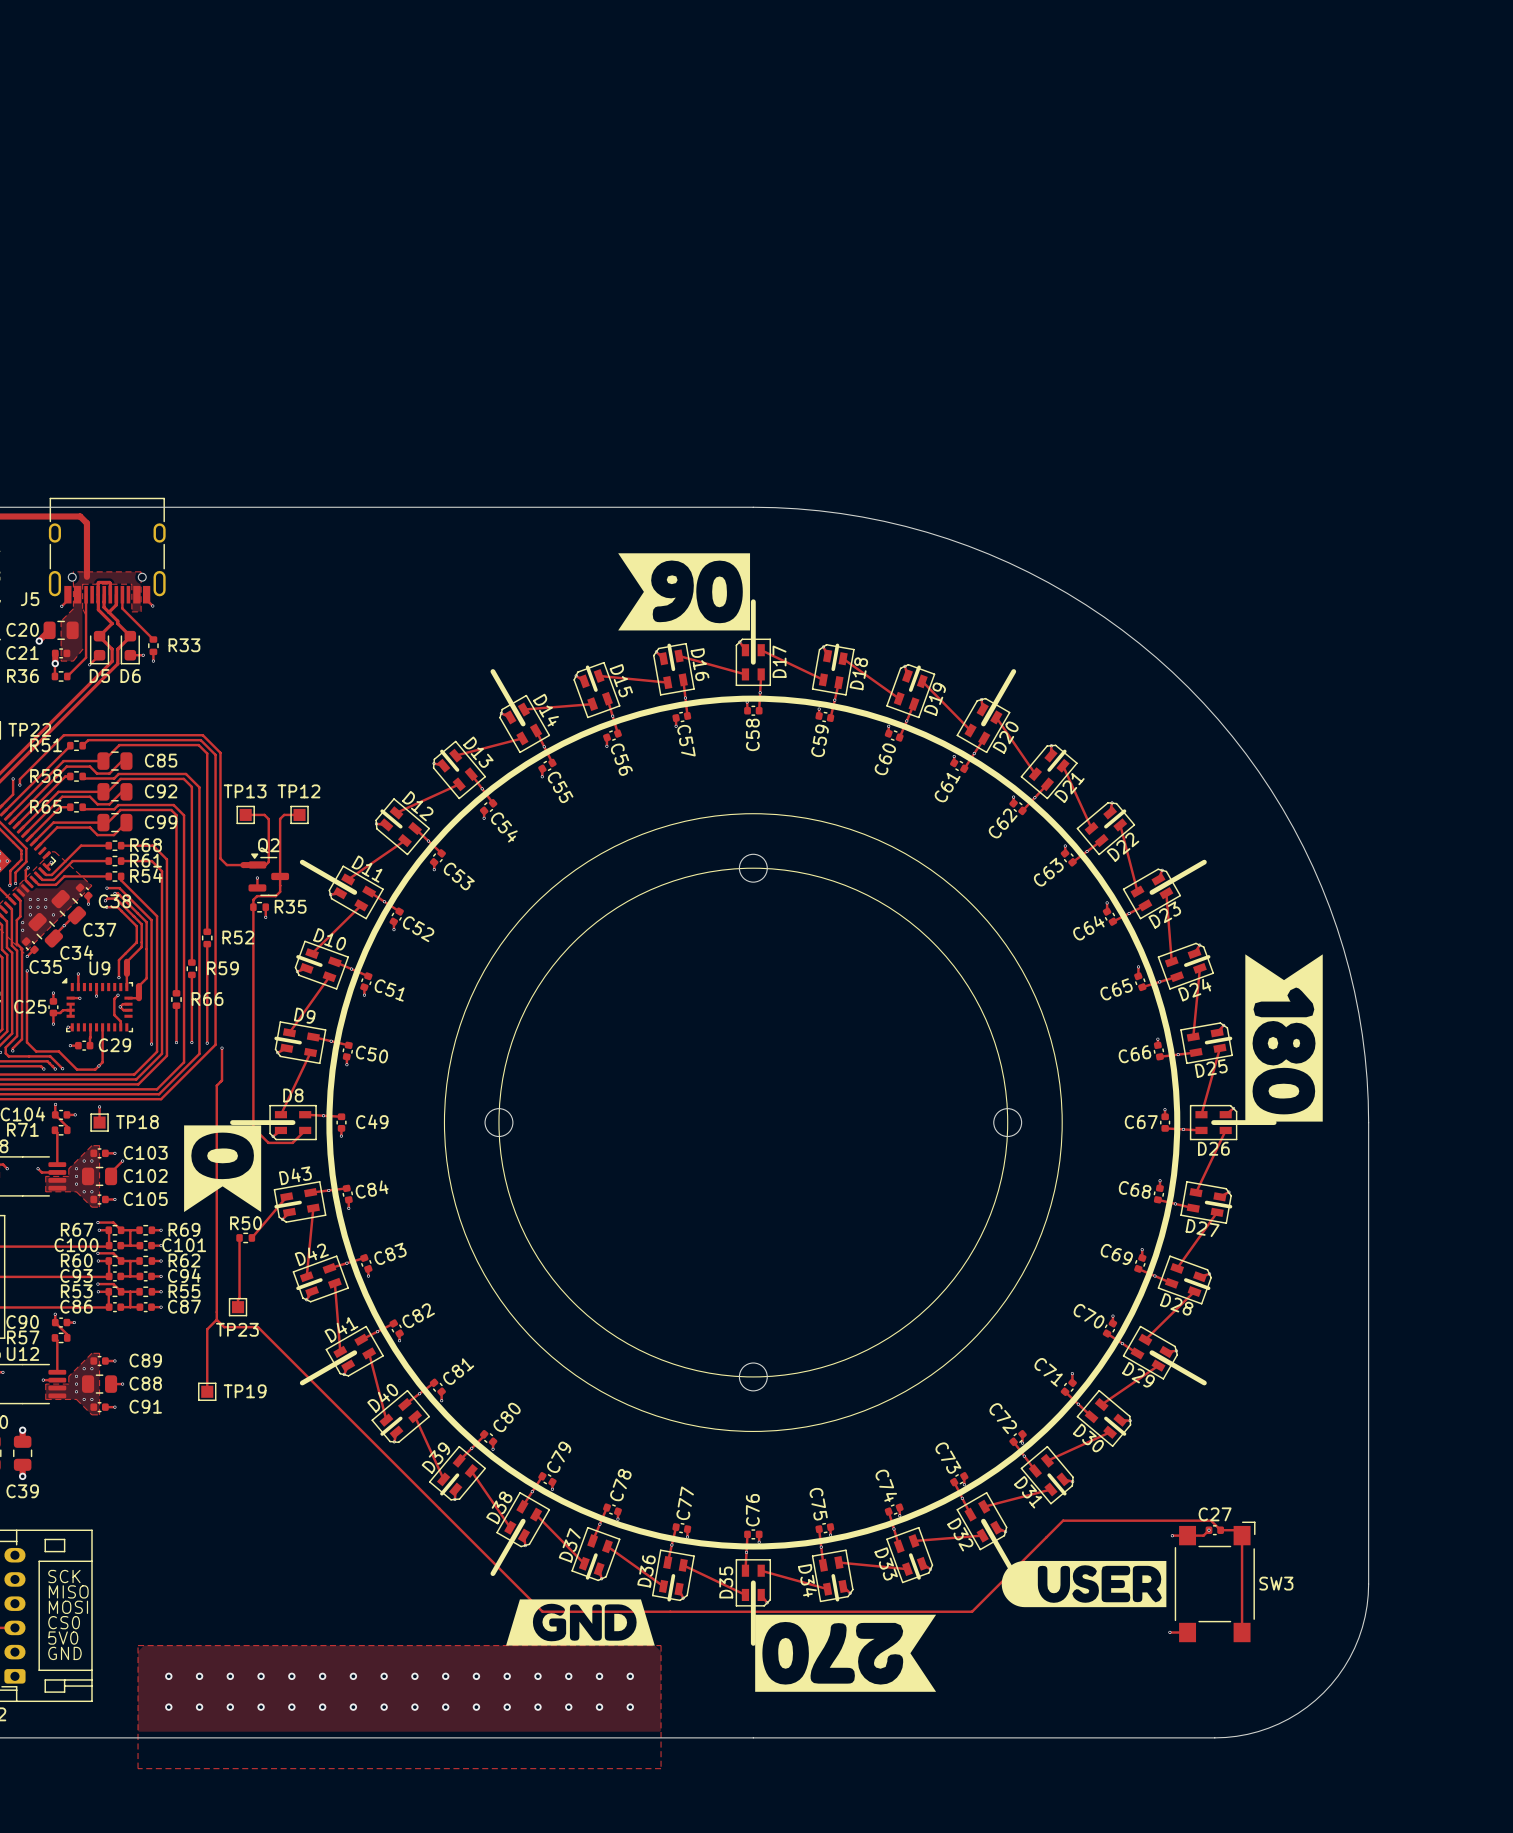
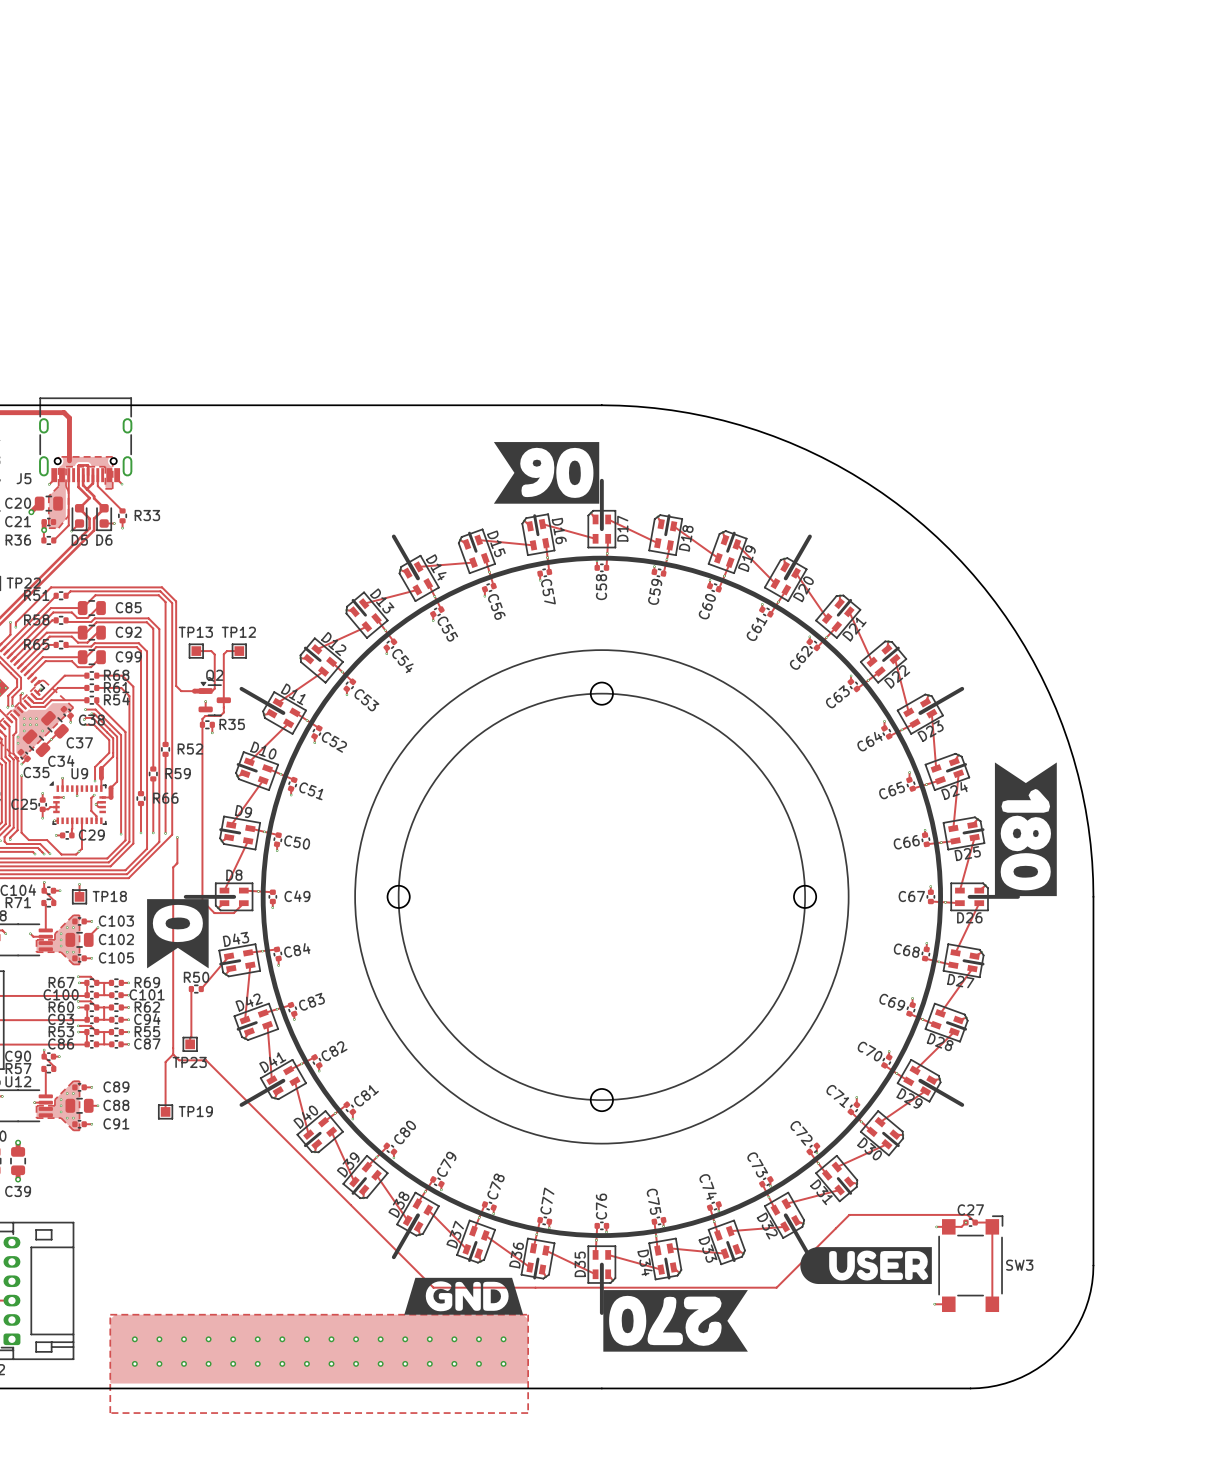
text: SCK (64, 1576) -> none
text: MISO (68, 1591) -> none
text: MOSI (68, 1607) -> none
text: CS0 (64, 1622) -> none
text: 5V0 (63, 1638) -> none
text: GND (64, 1653) -> none

